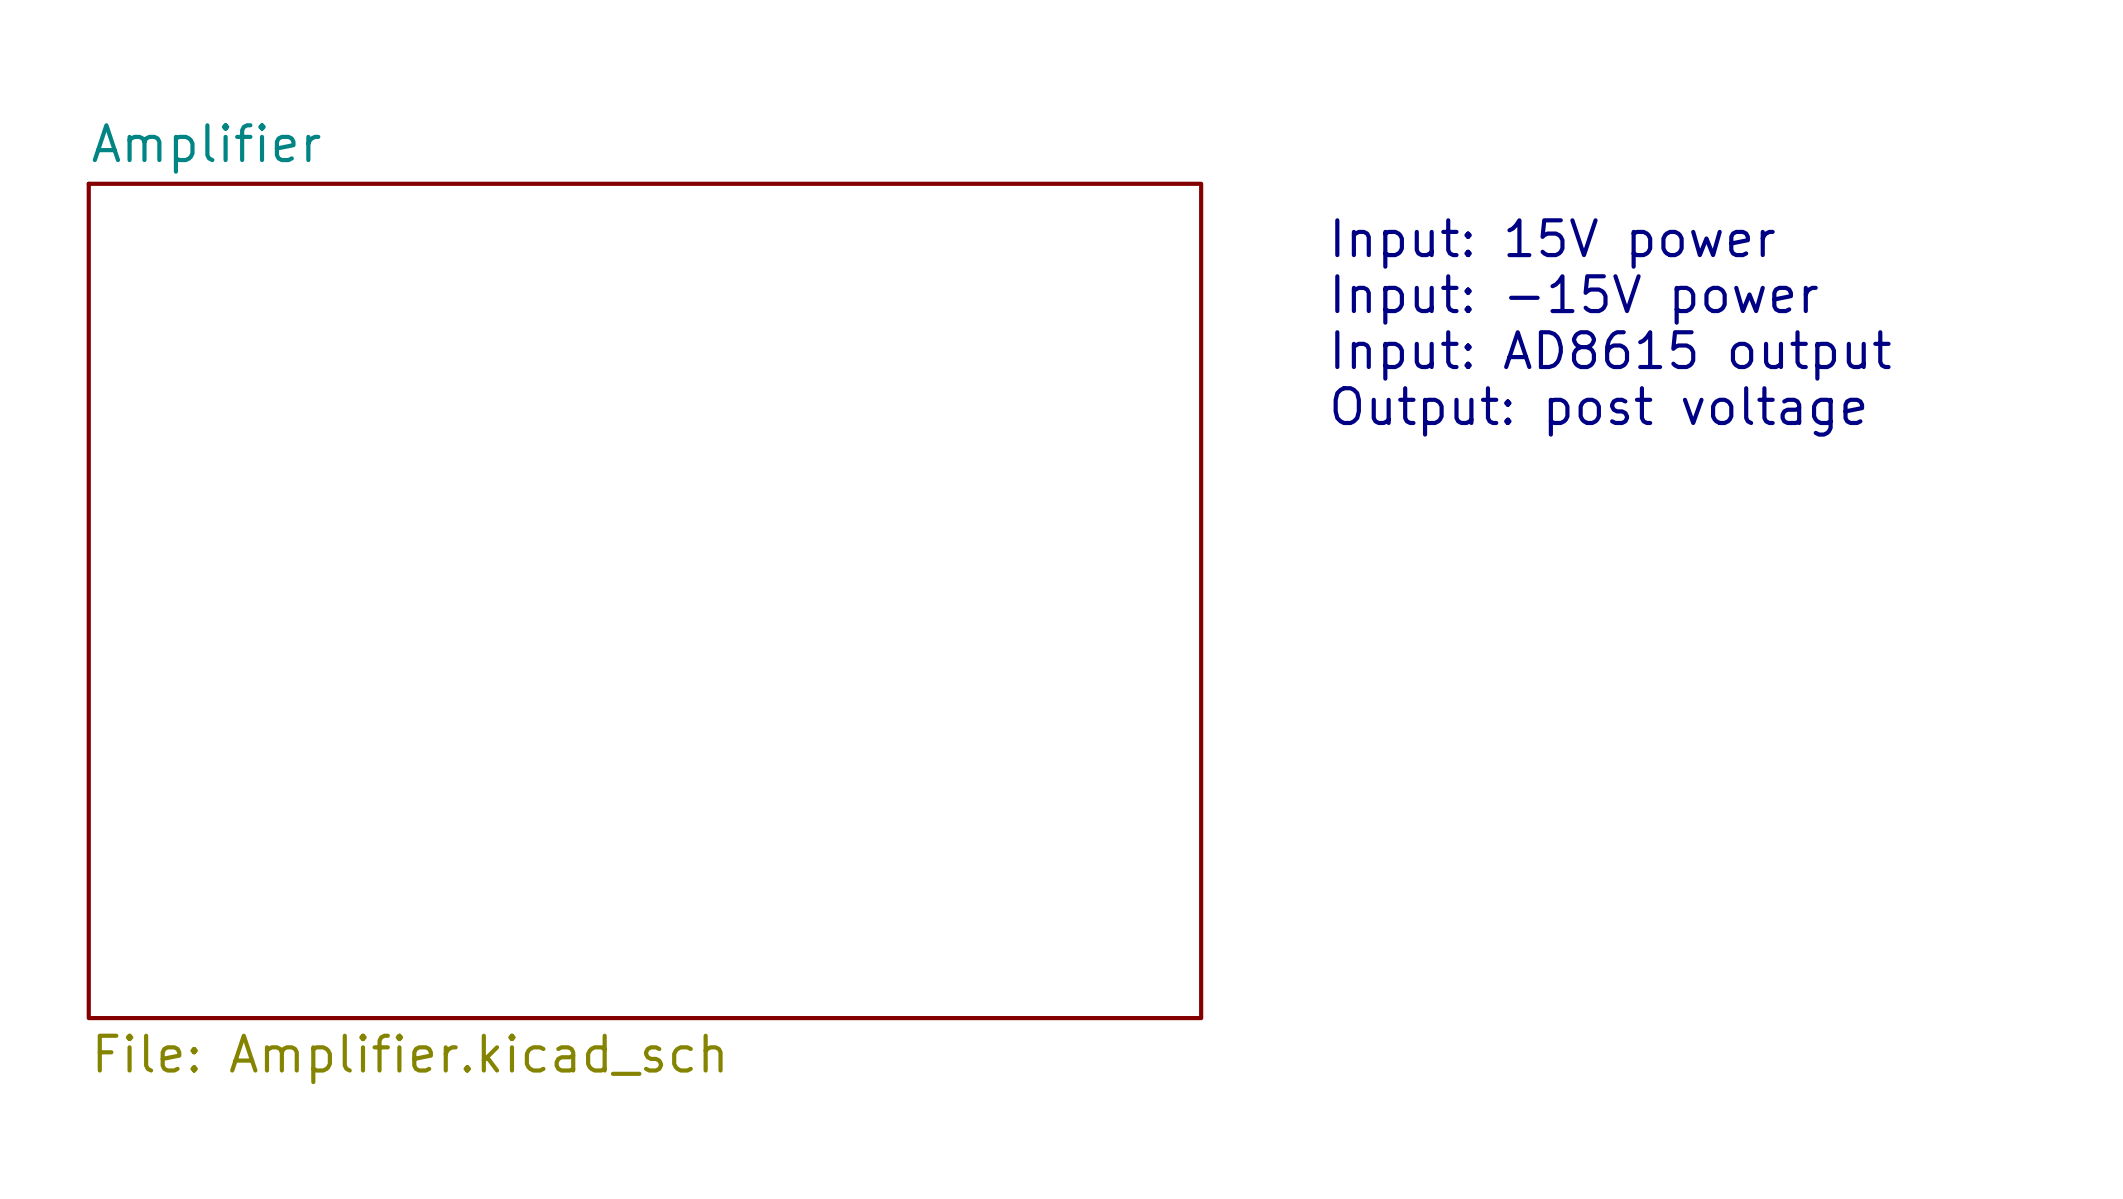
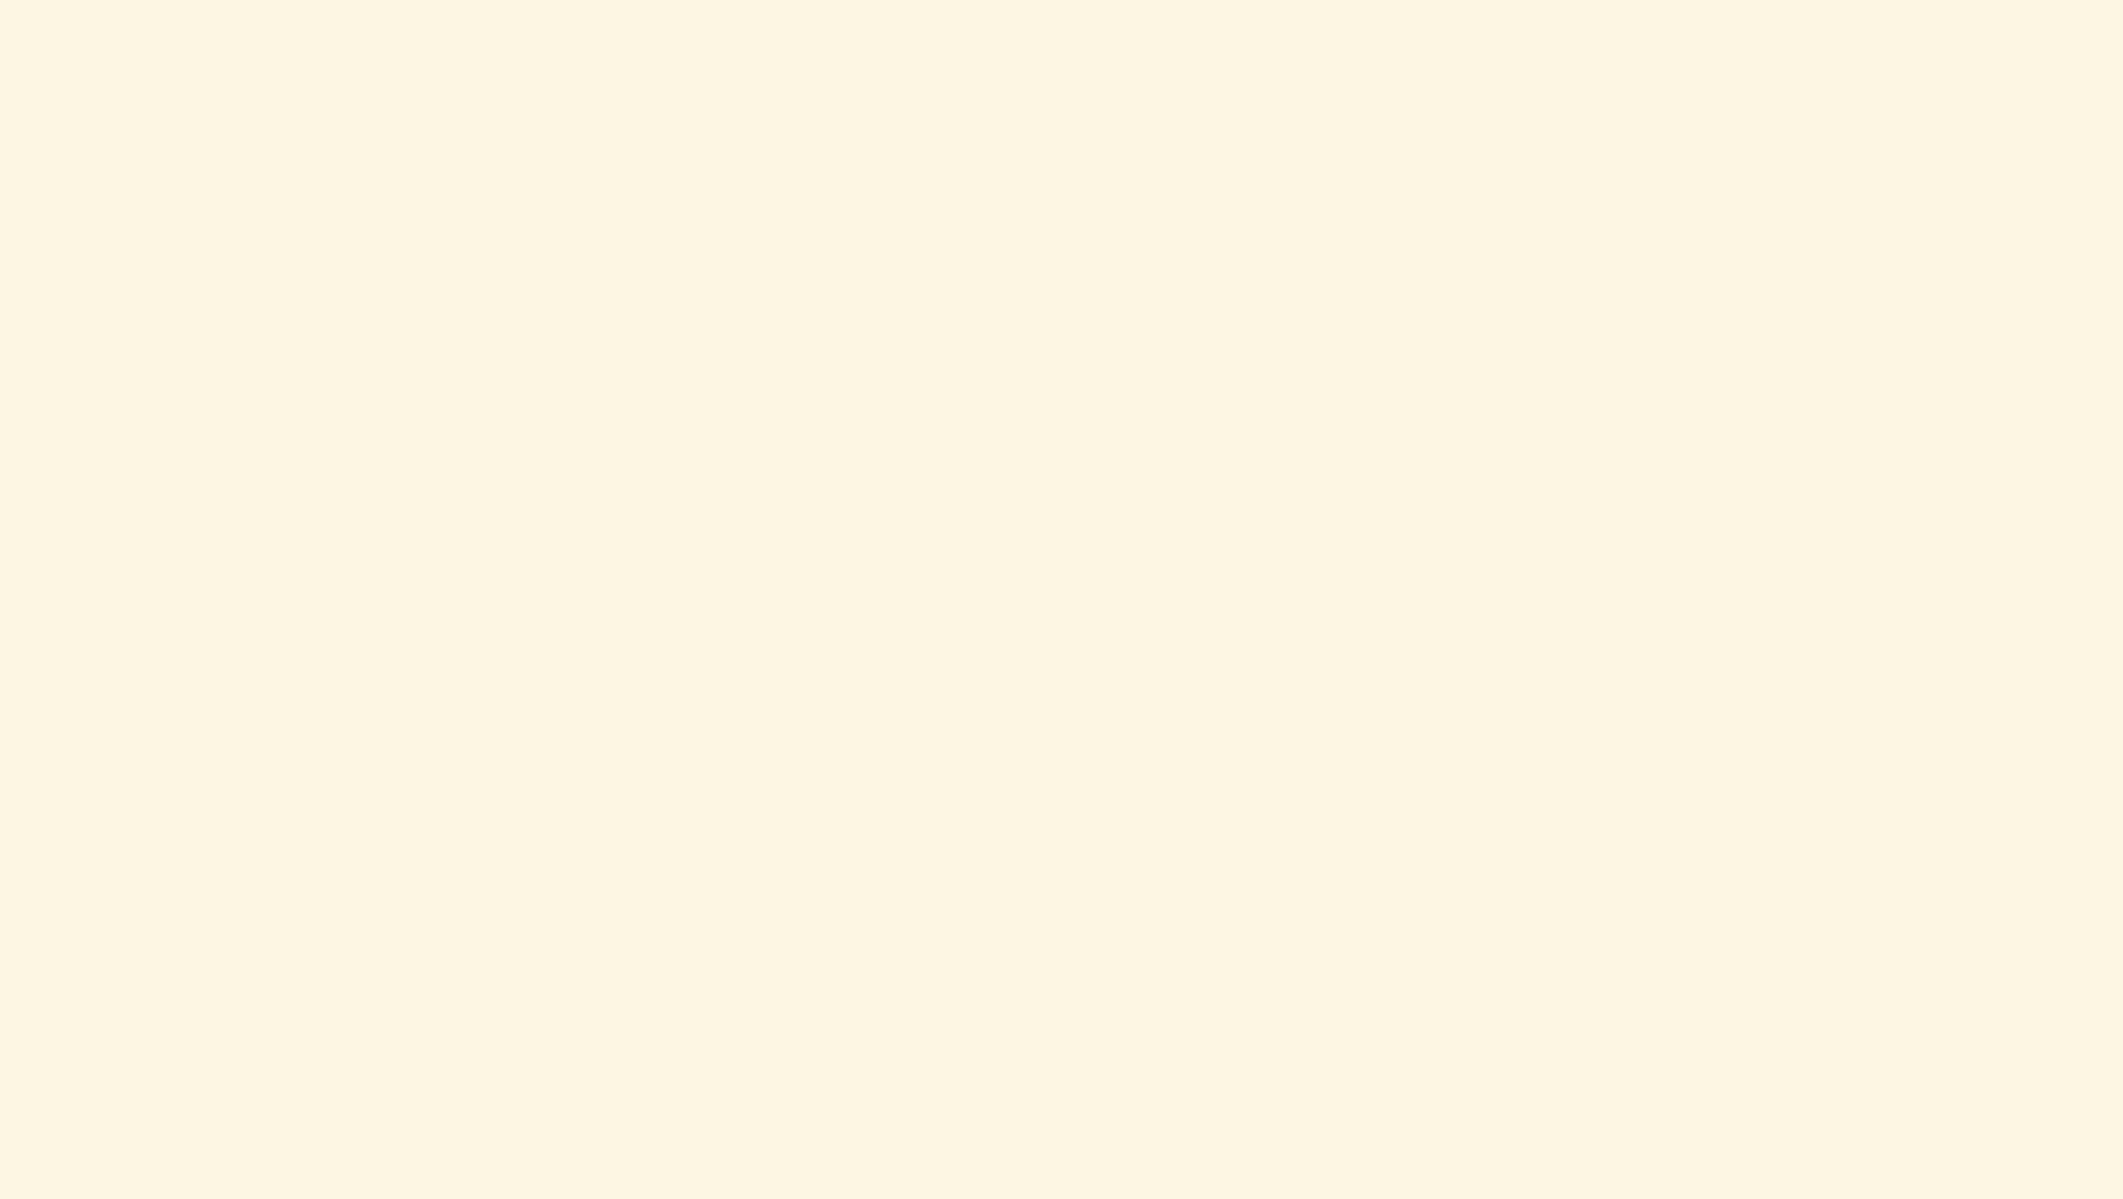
text: Input: 15V power (1555, 243) -> none
text: Input: -15V power (1576, 299) -> none
text: Input: AD8615 output (1612, 355) -> none
text: Output: post voltage (1598, 411) -> none
sheet Amplifier: File: Amplifier.kicad_sch (644, 600) -> none

